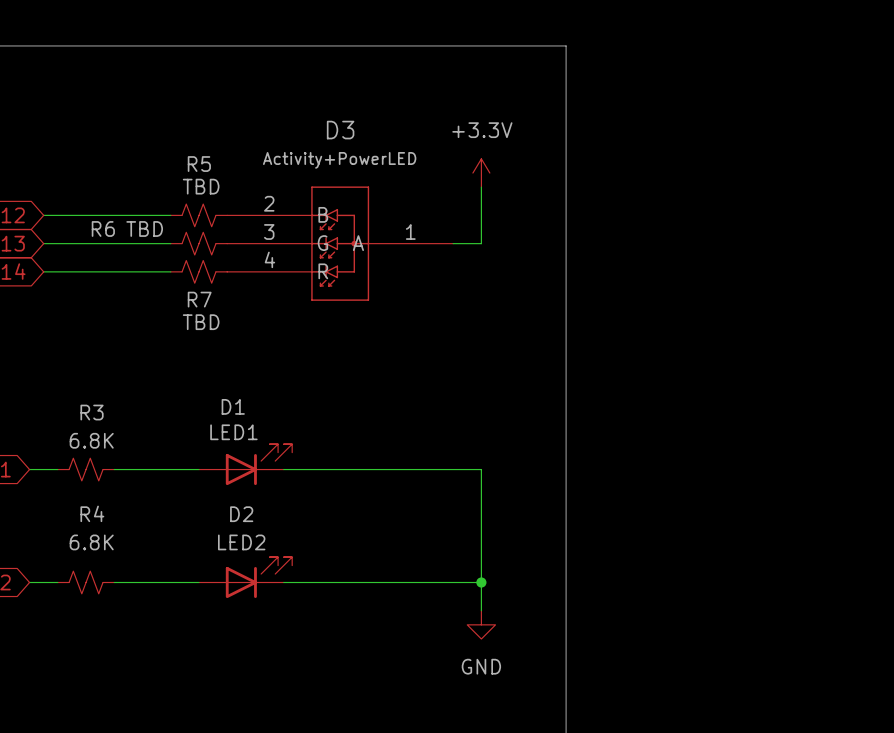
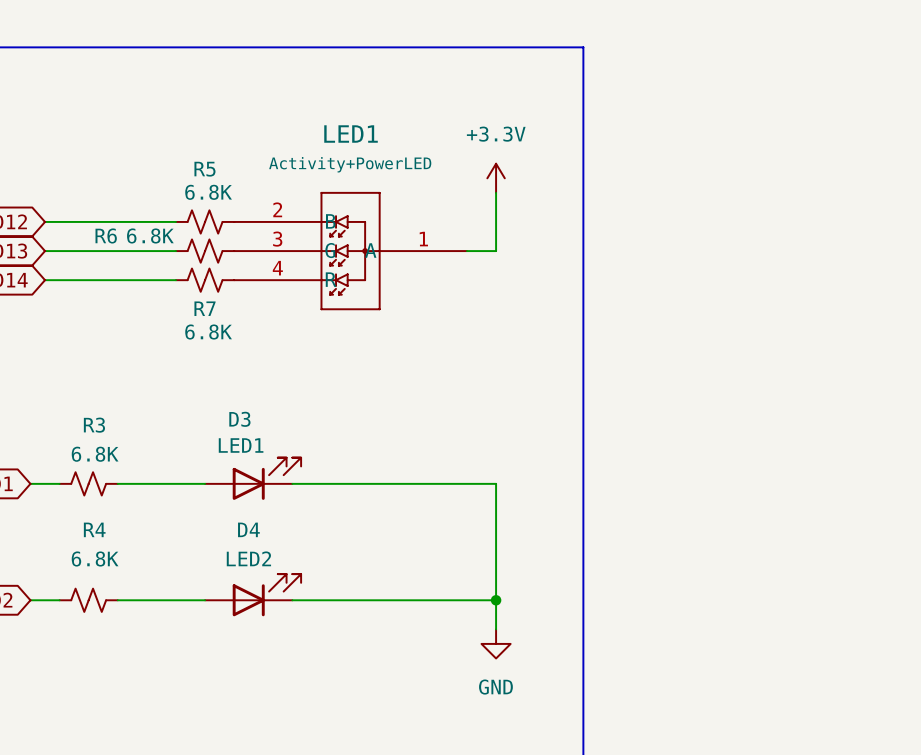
D3 name: D3 (340, 130) -> LED1 (351, 134)
R5 value: TBD (201, 186) -> 6.8K (208, 192)
R6 value: TBD (144, 228) -> 6.8K (150, 235)
R7 value: TBD (201, 322) -> 6.8K (208, 332)
D1 name: D1 (233, 406) -> D3 (239, 419)
D2 name: D2 (241, 514) -> D4 (248, 529)

